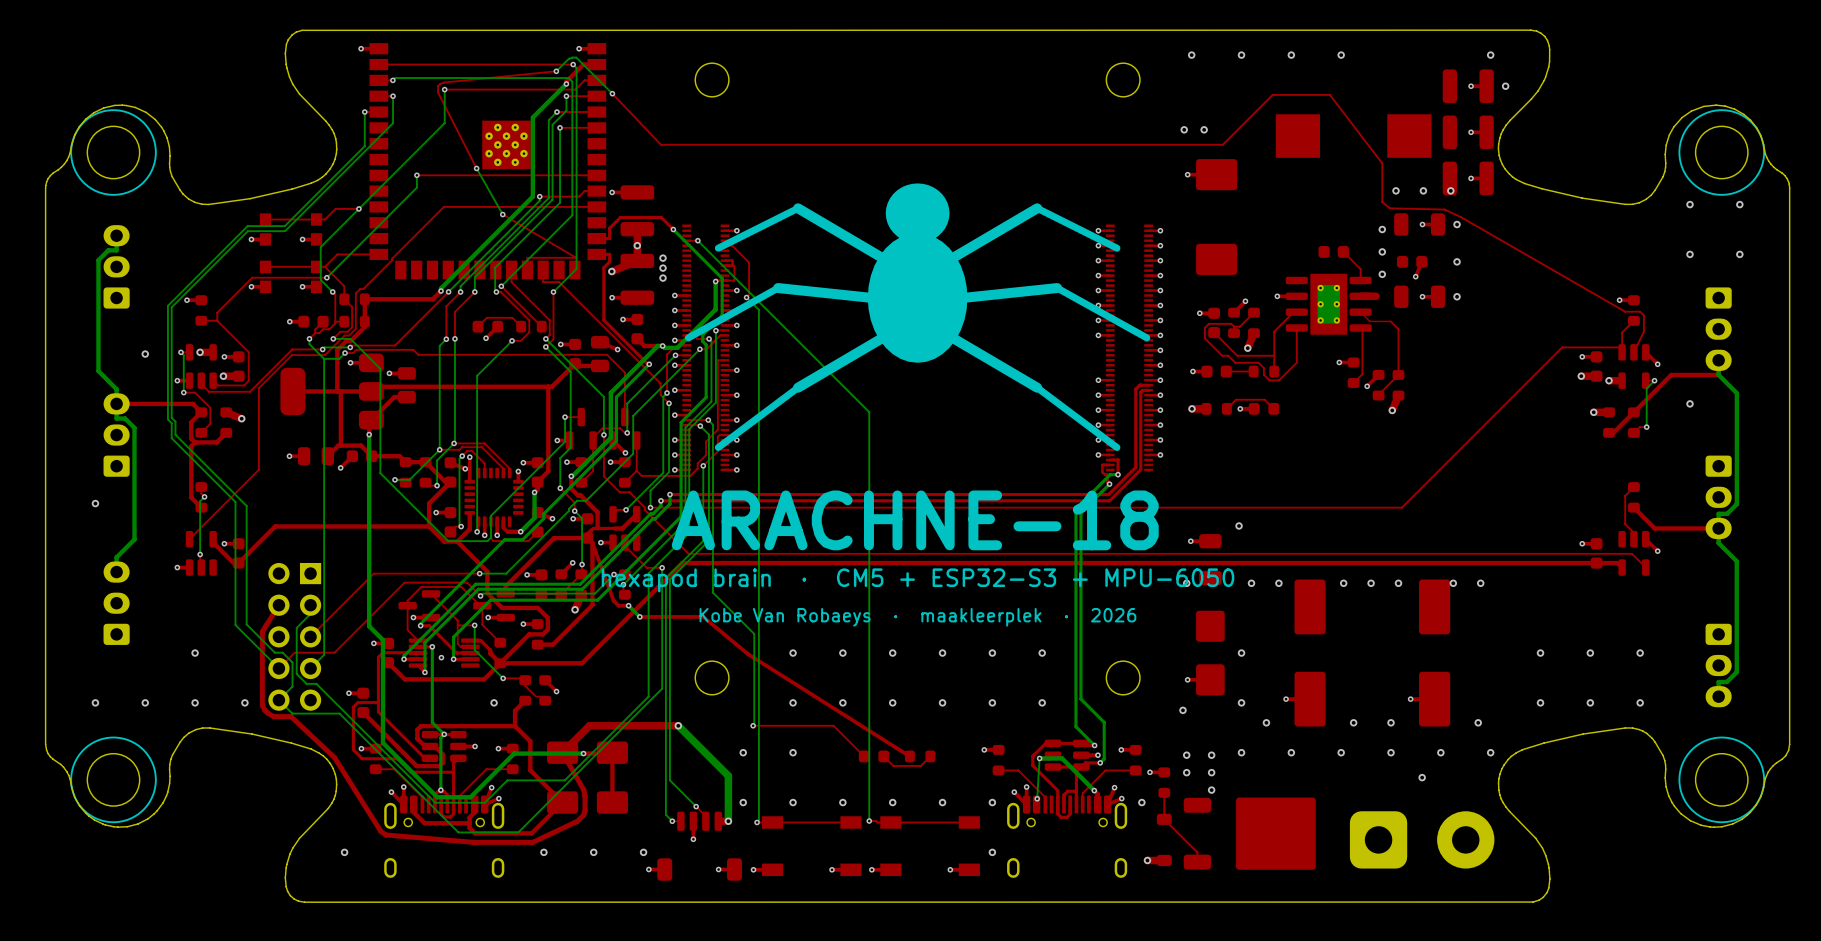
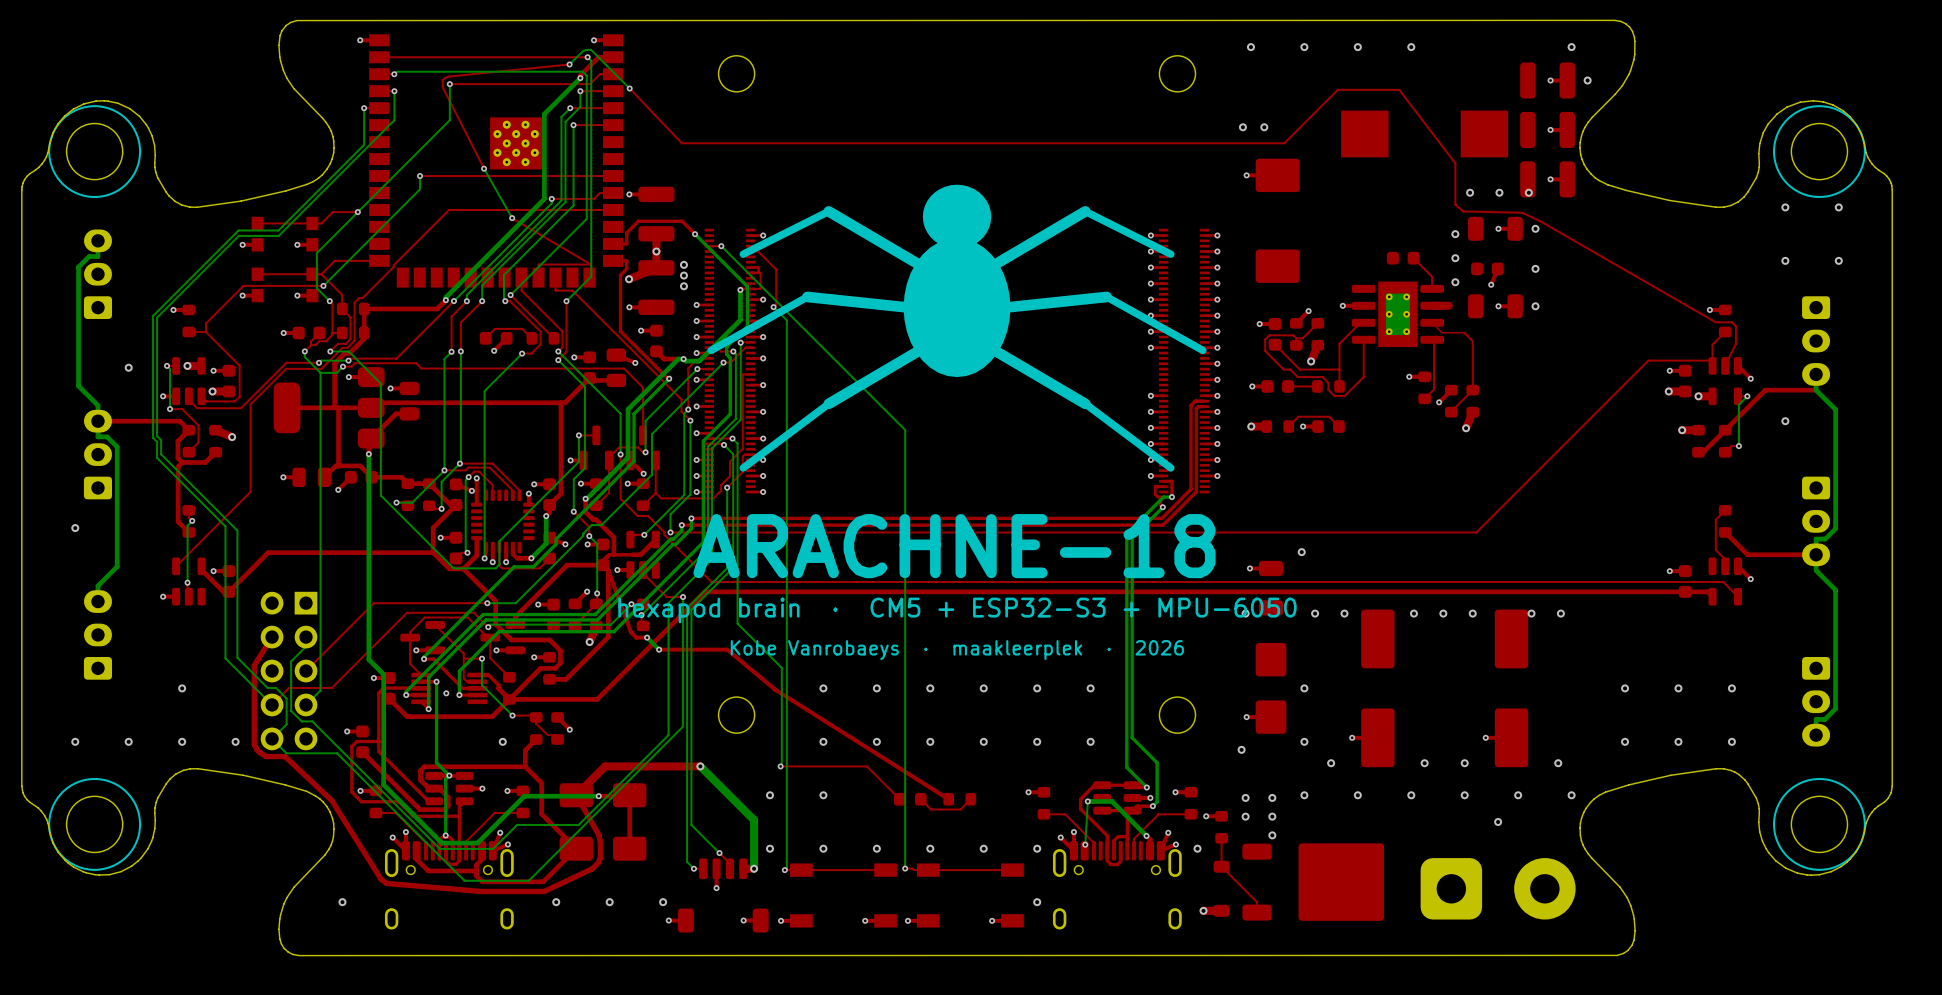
text: Kobe Van Robaeys · maakleerplek · 2026 (917, 617) -> Kobe Vanrobaeys · maakleerplek · 2026 (957, 650)

